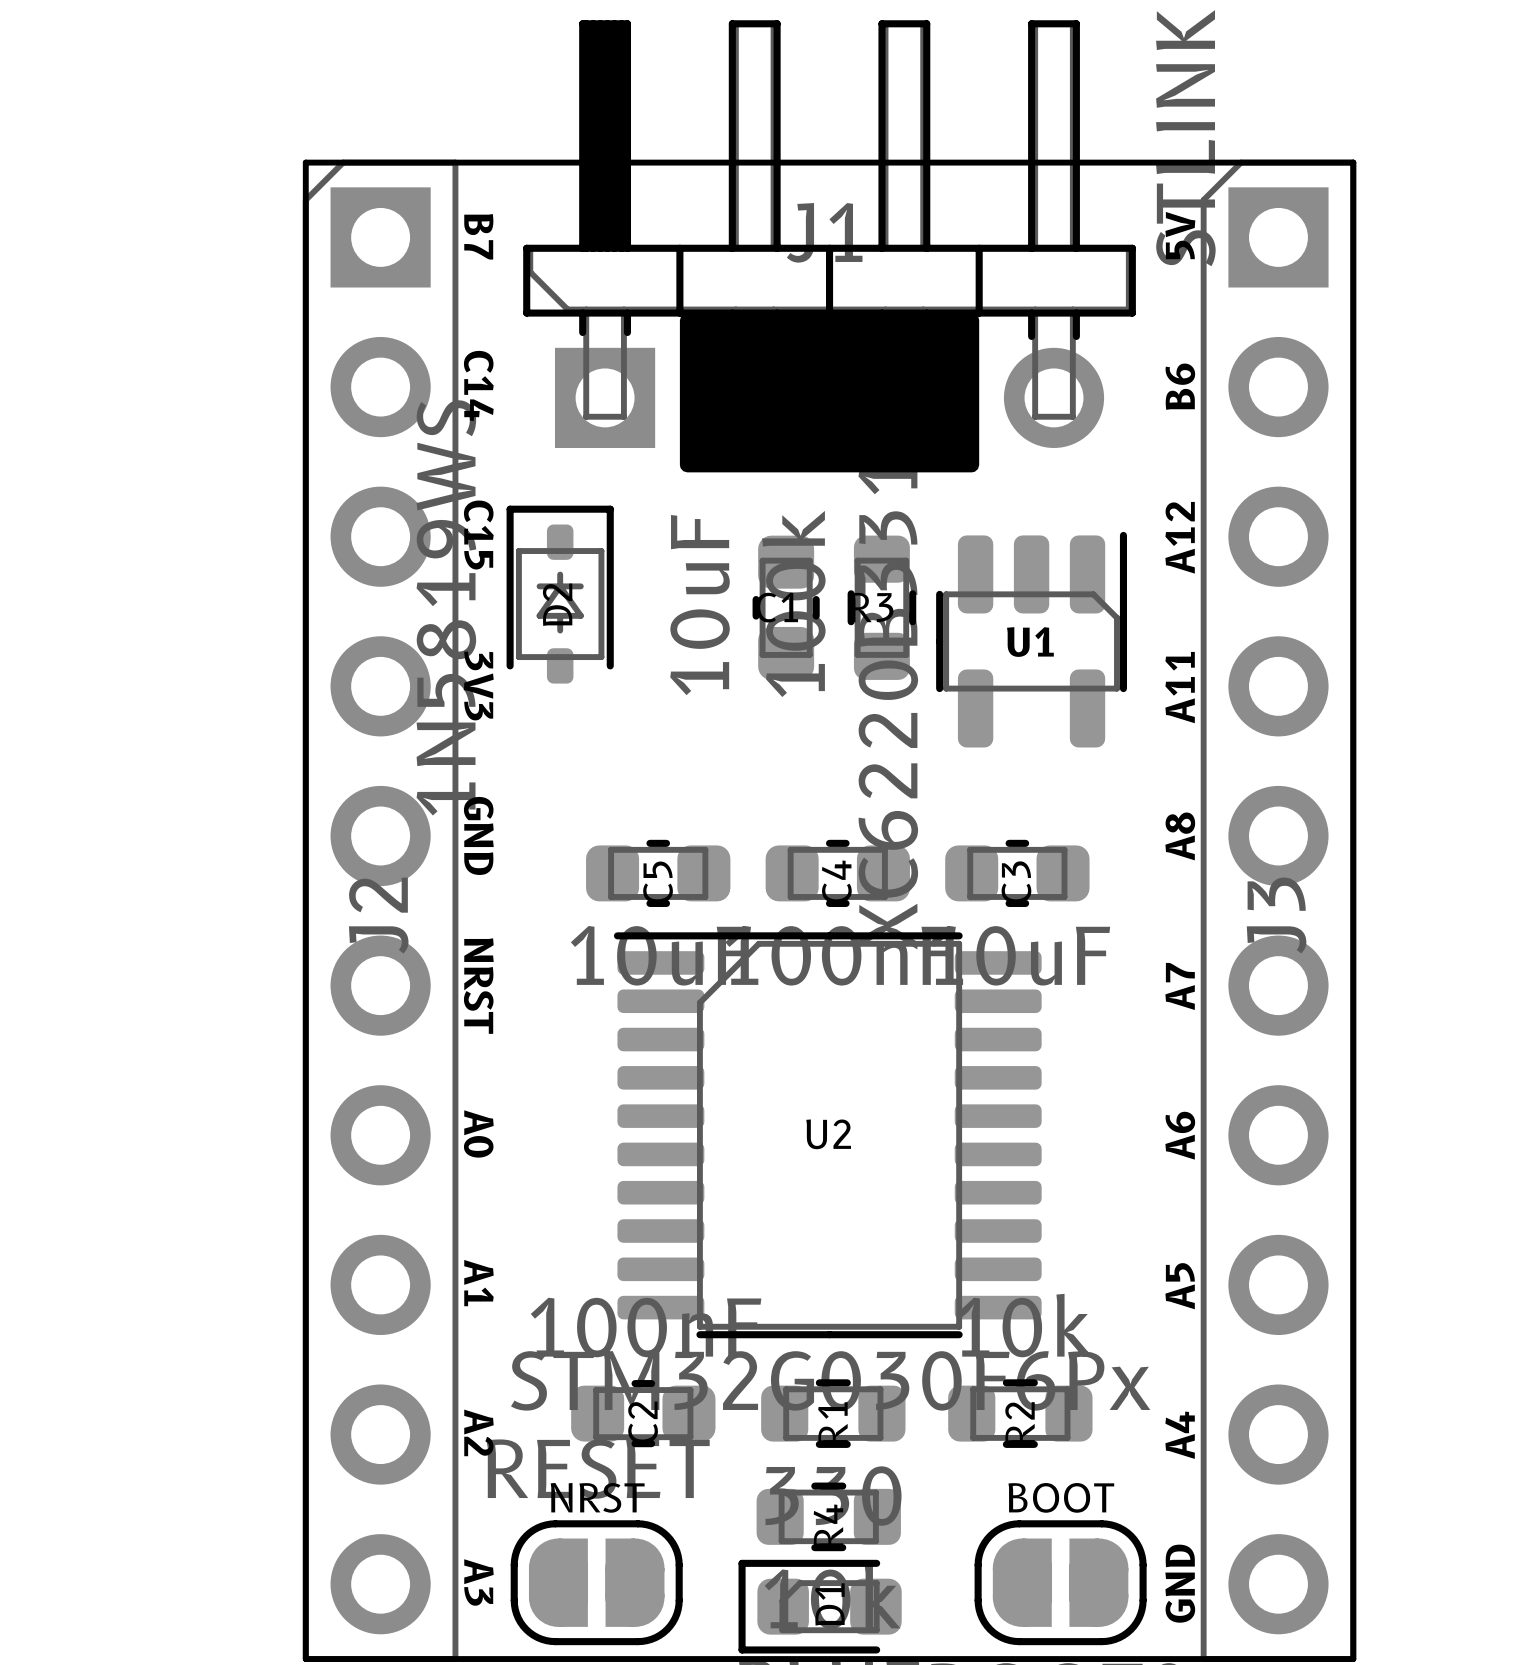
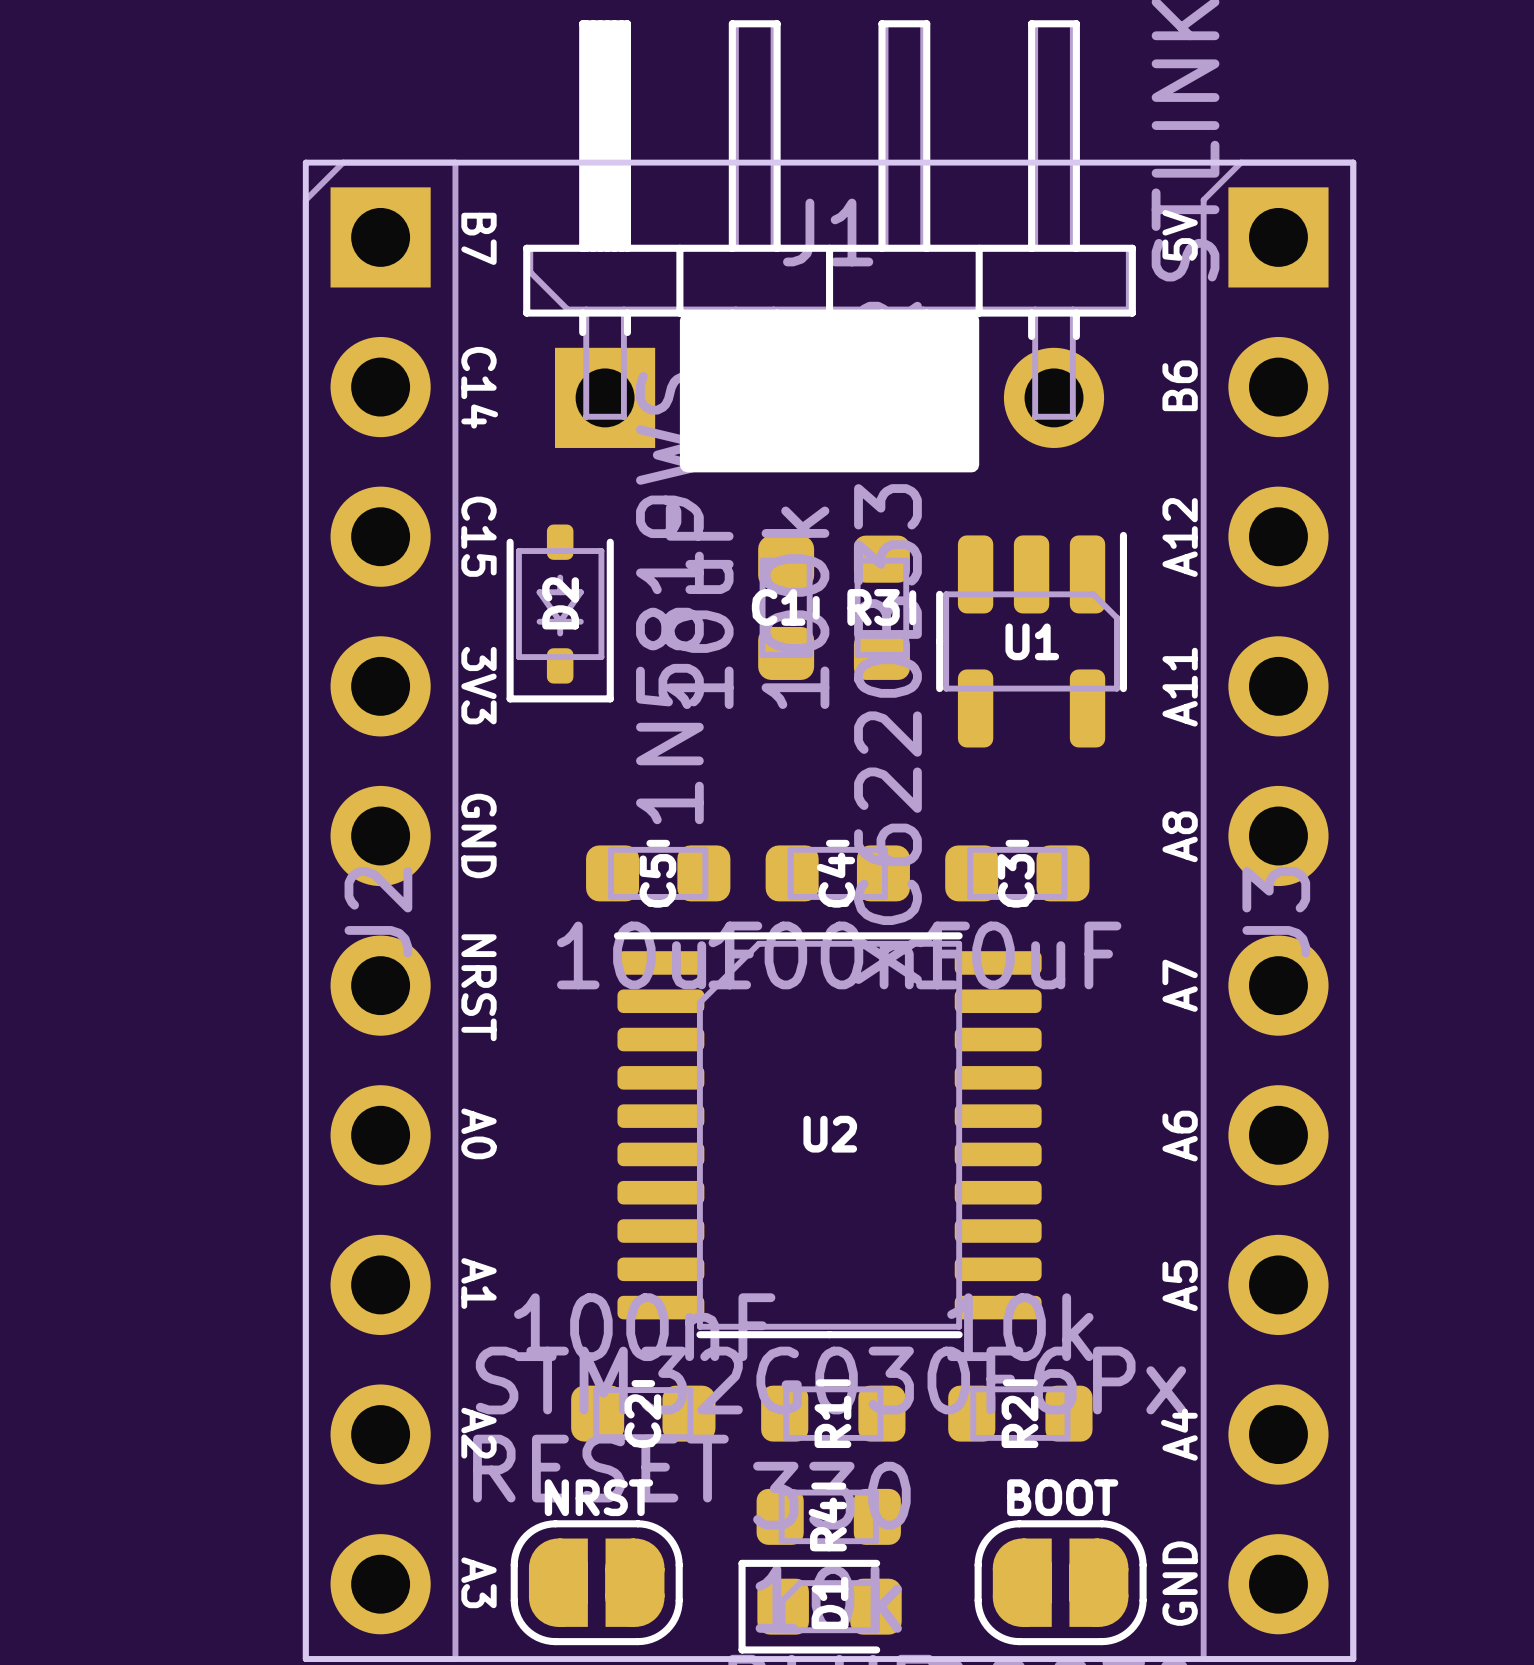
D2 rotation: 0° (560, 594) -> 180° (560, 613)

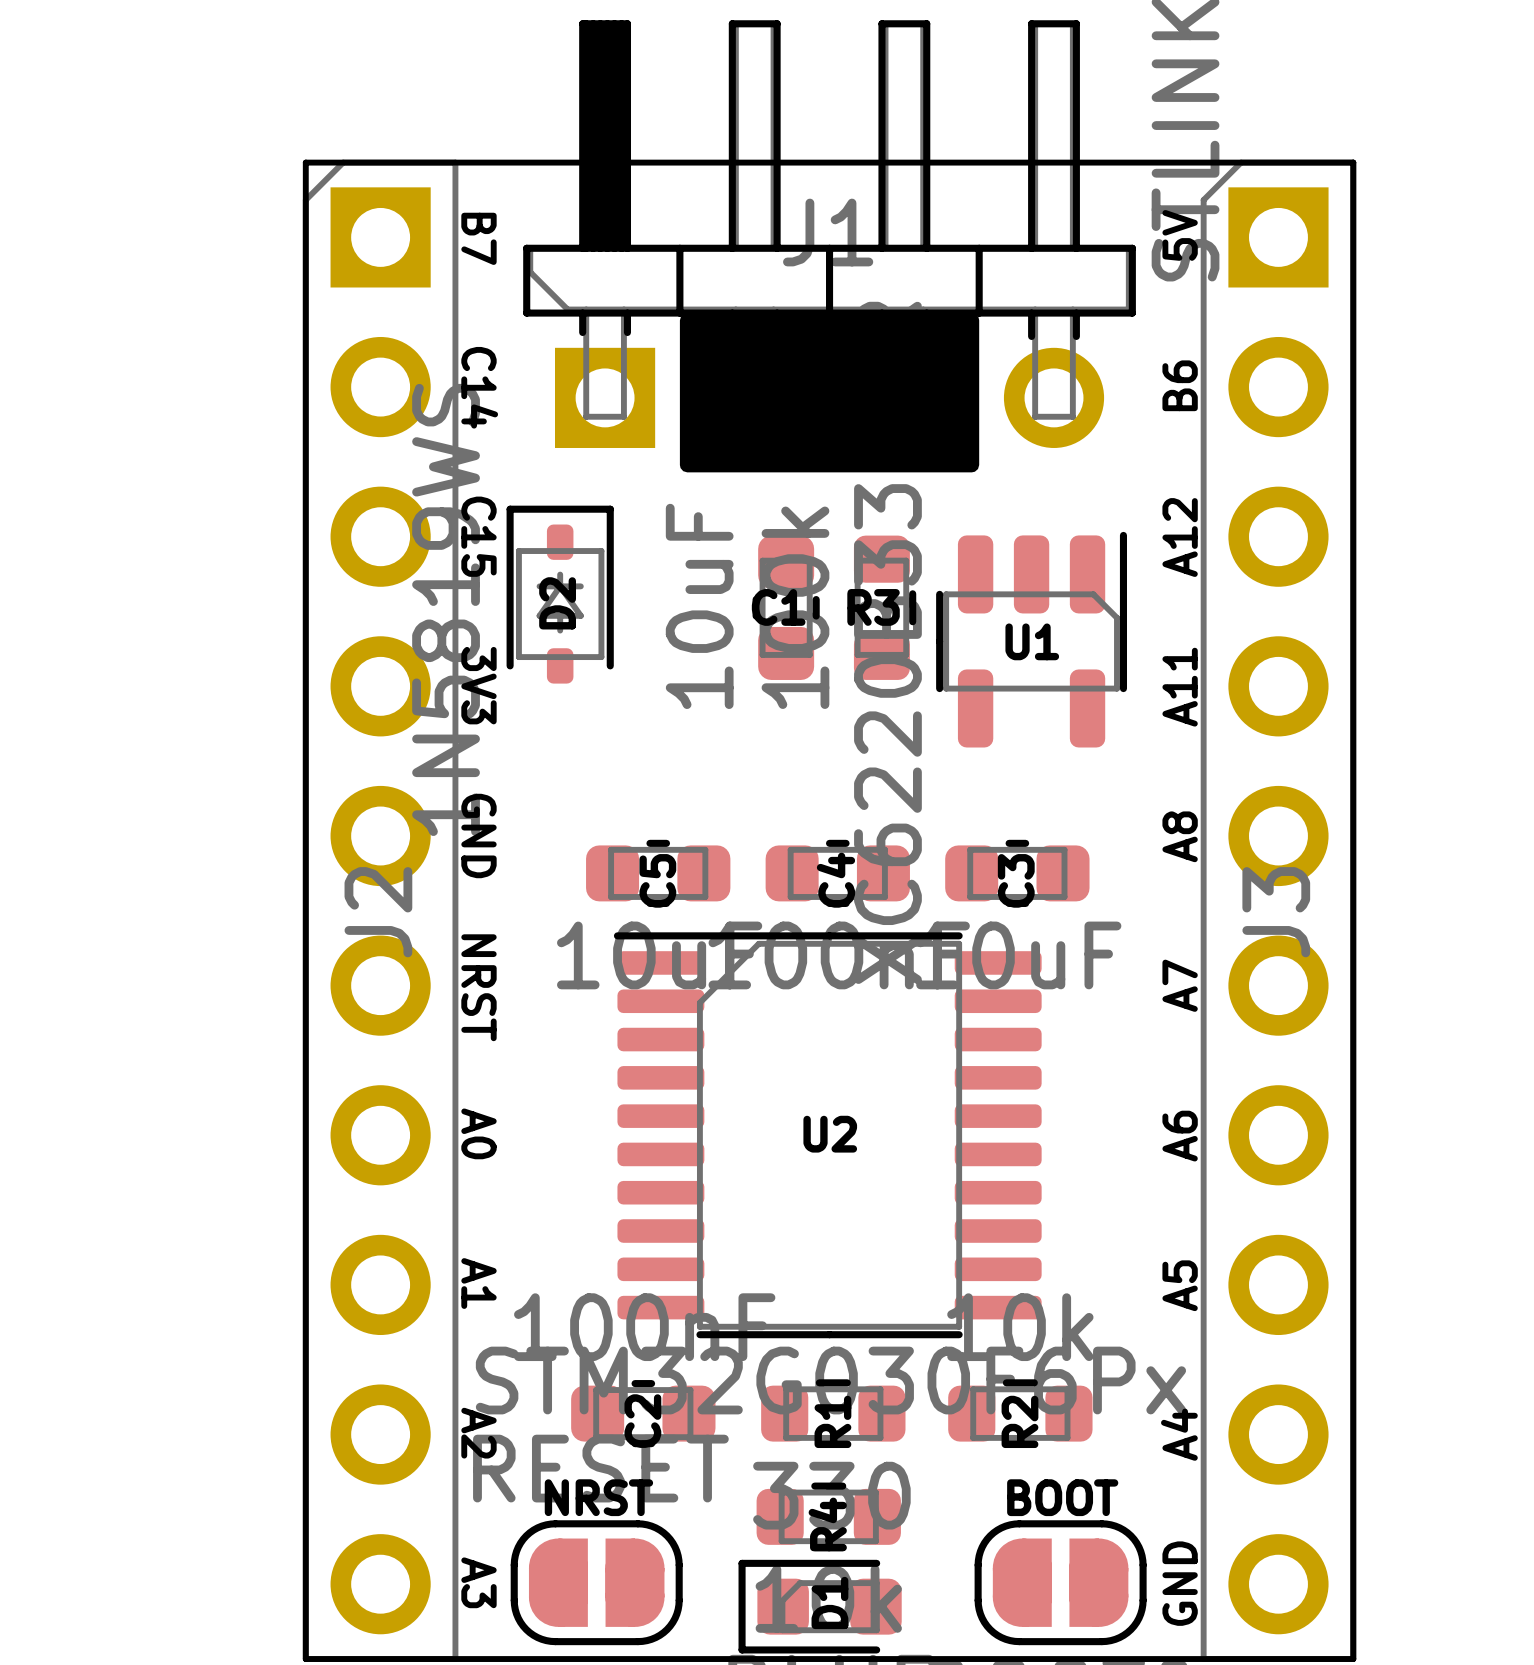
D2 rotation: 0° (560, 613) -> 180° (560, 594)

